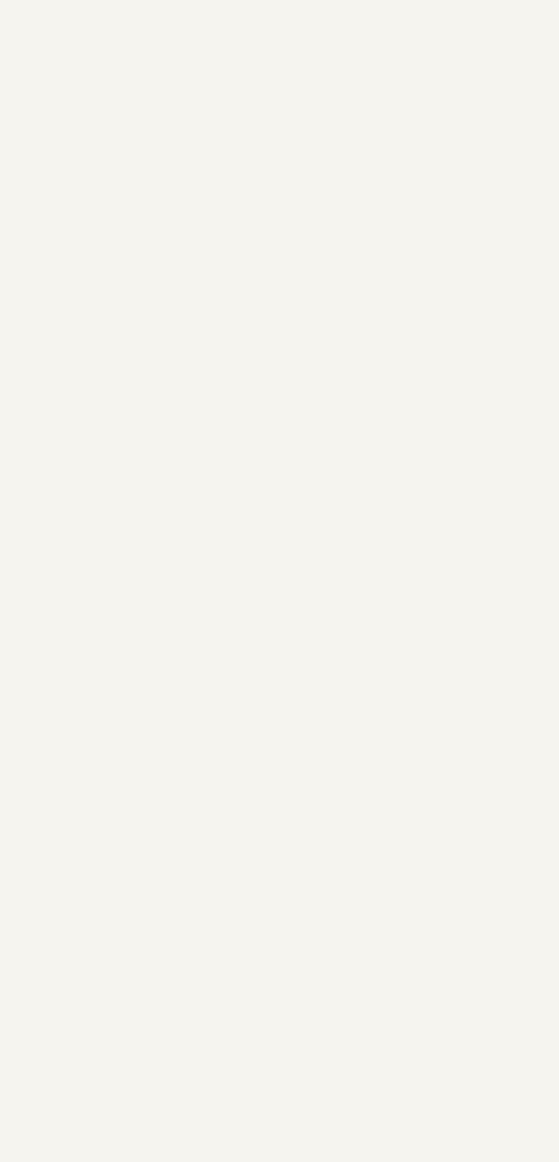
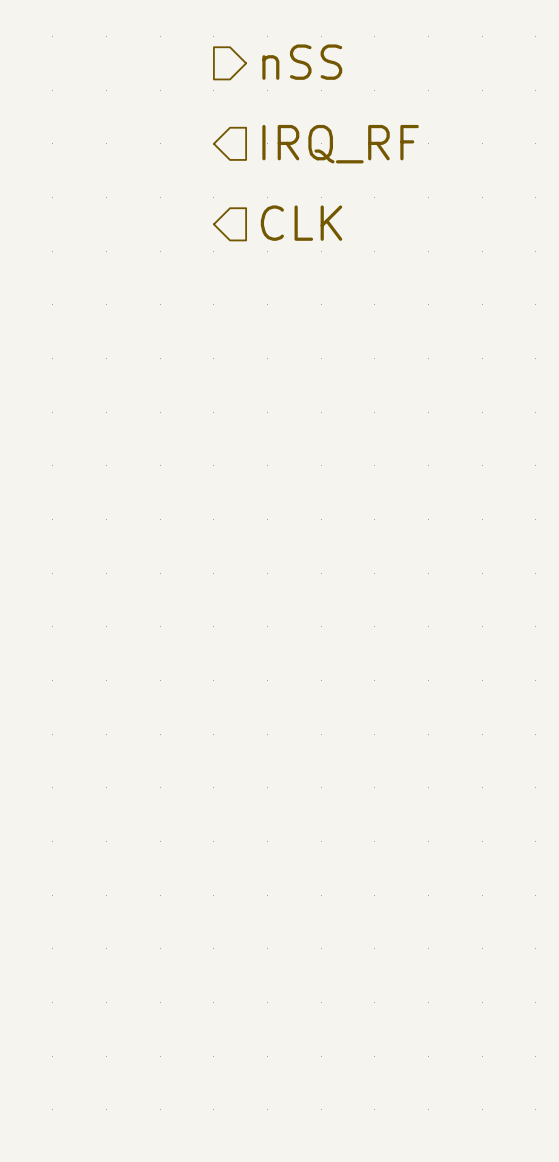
hierarchical label: none -> nSS (302, 62)
hierarchical label: none -> IRQ_RF (340, 144)
hierarchical label: none -> CLK (301, 223)

